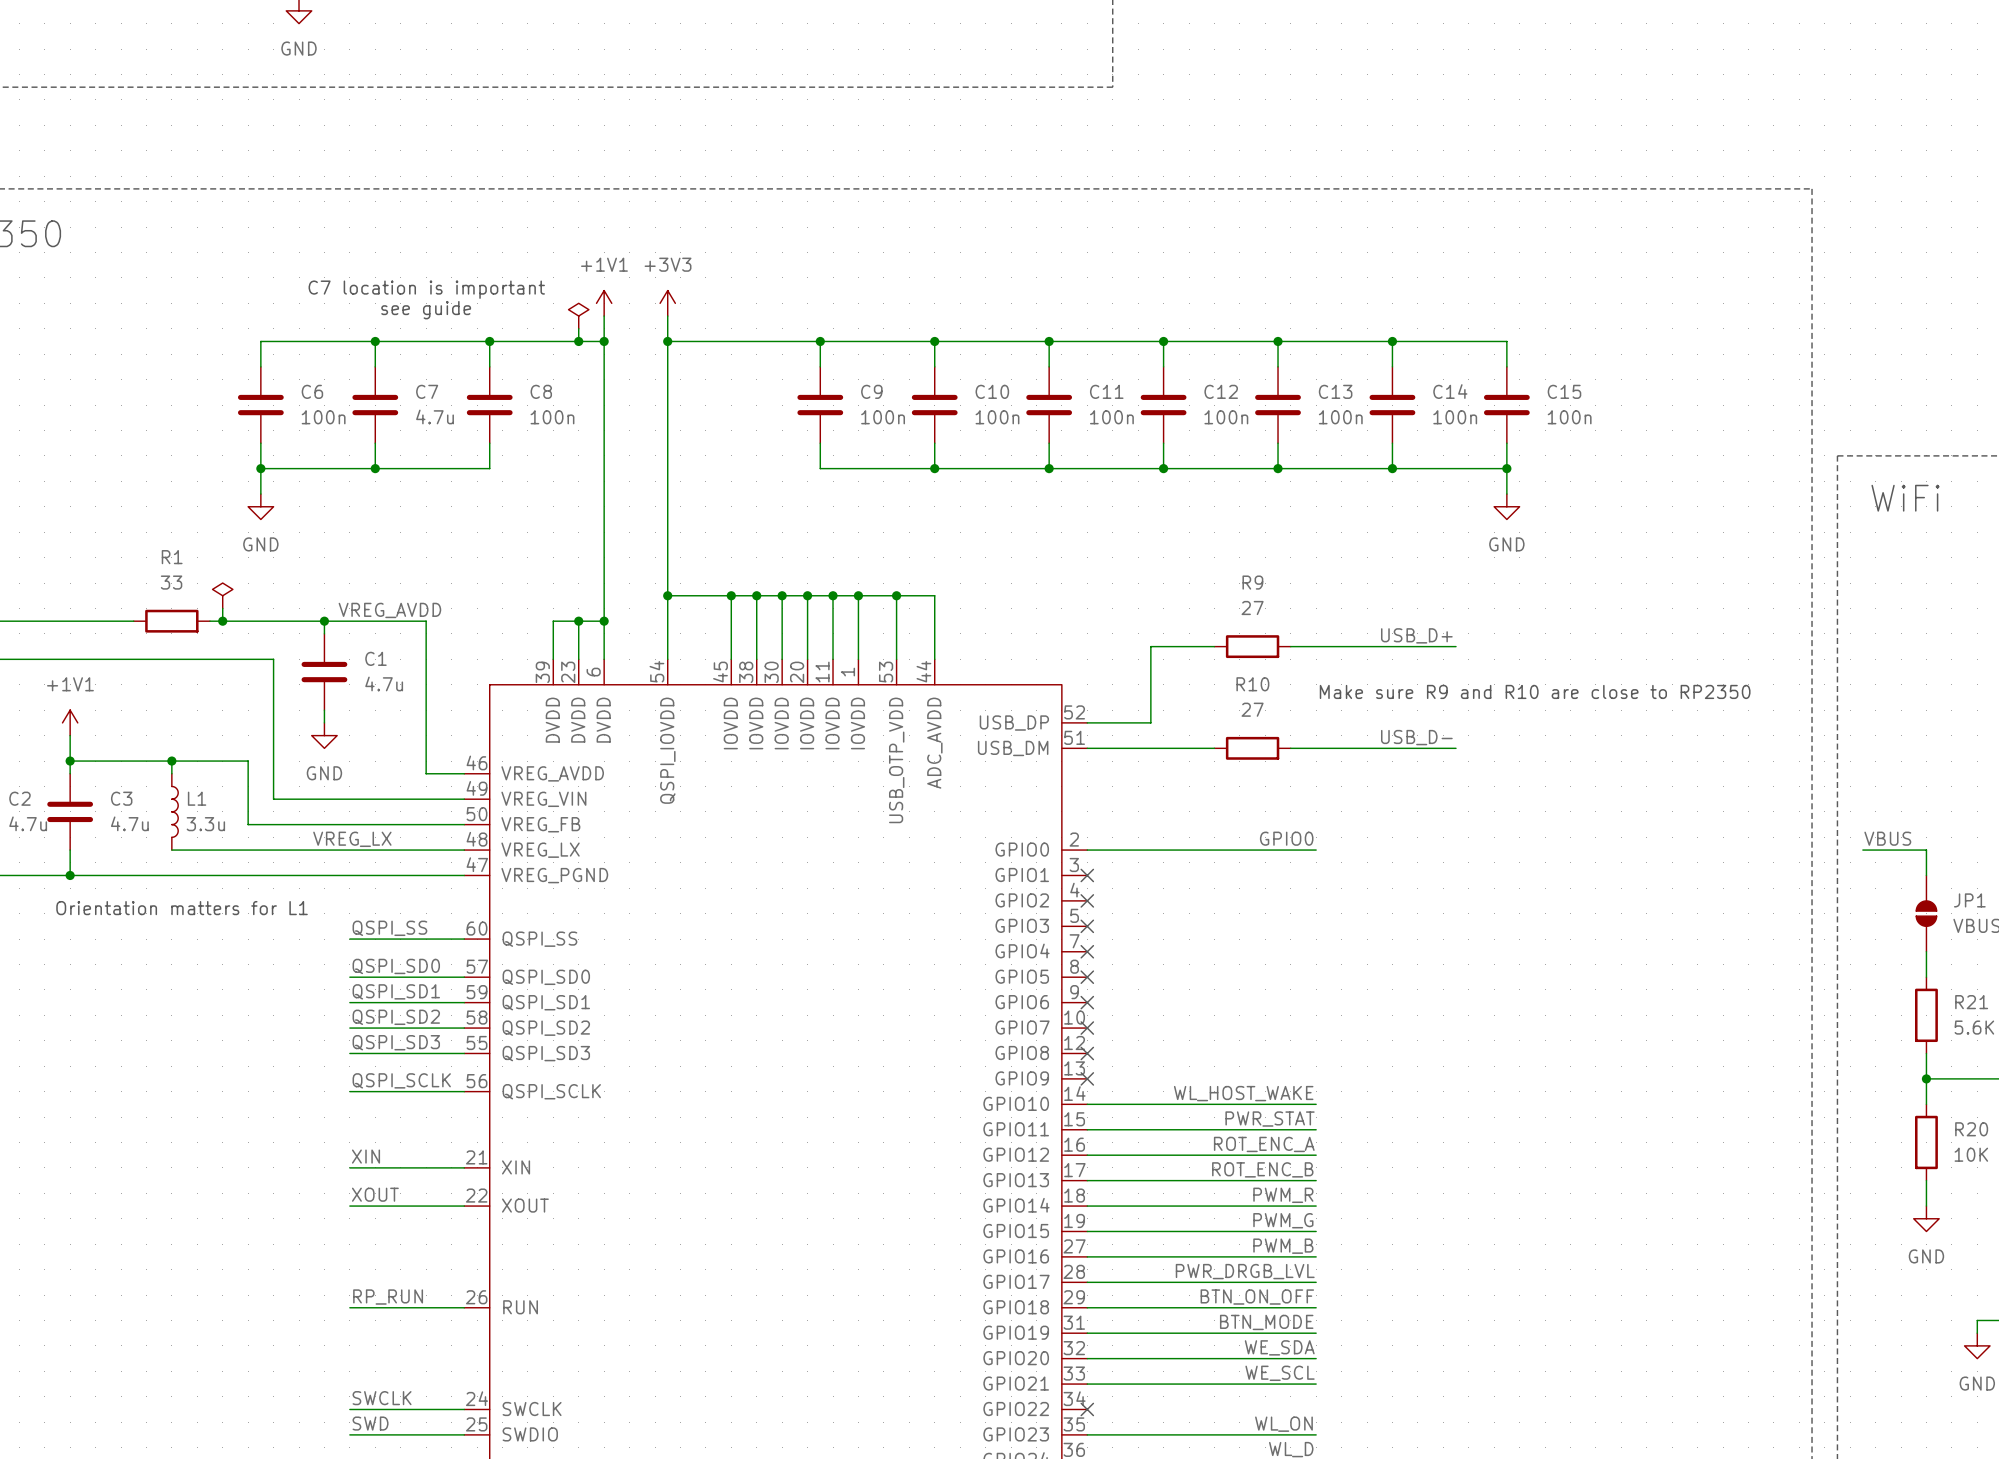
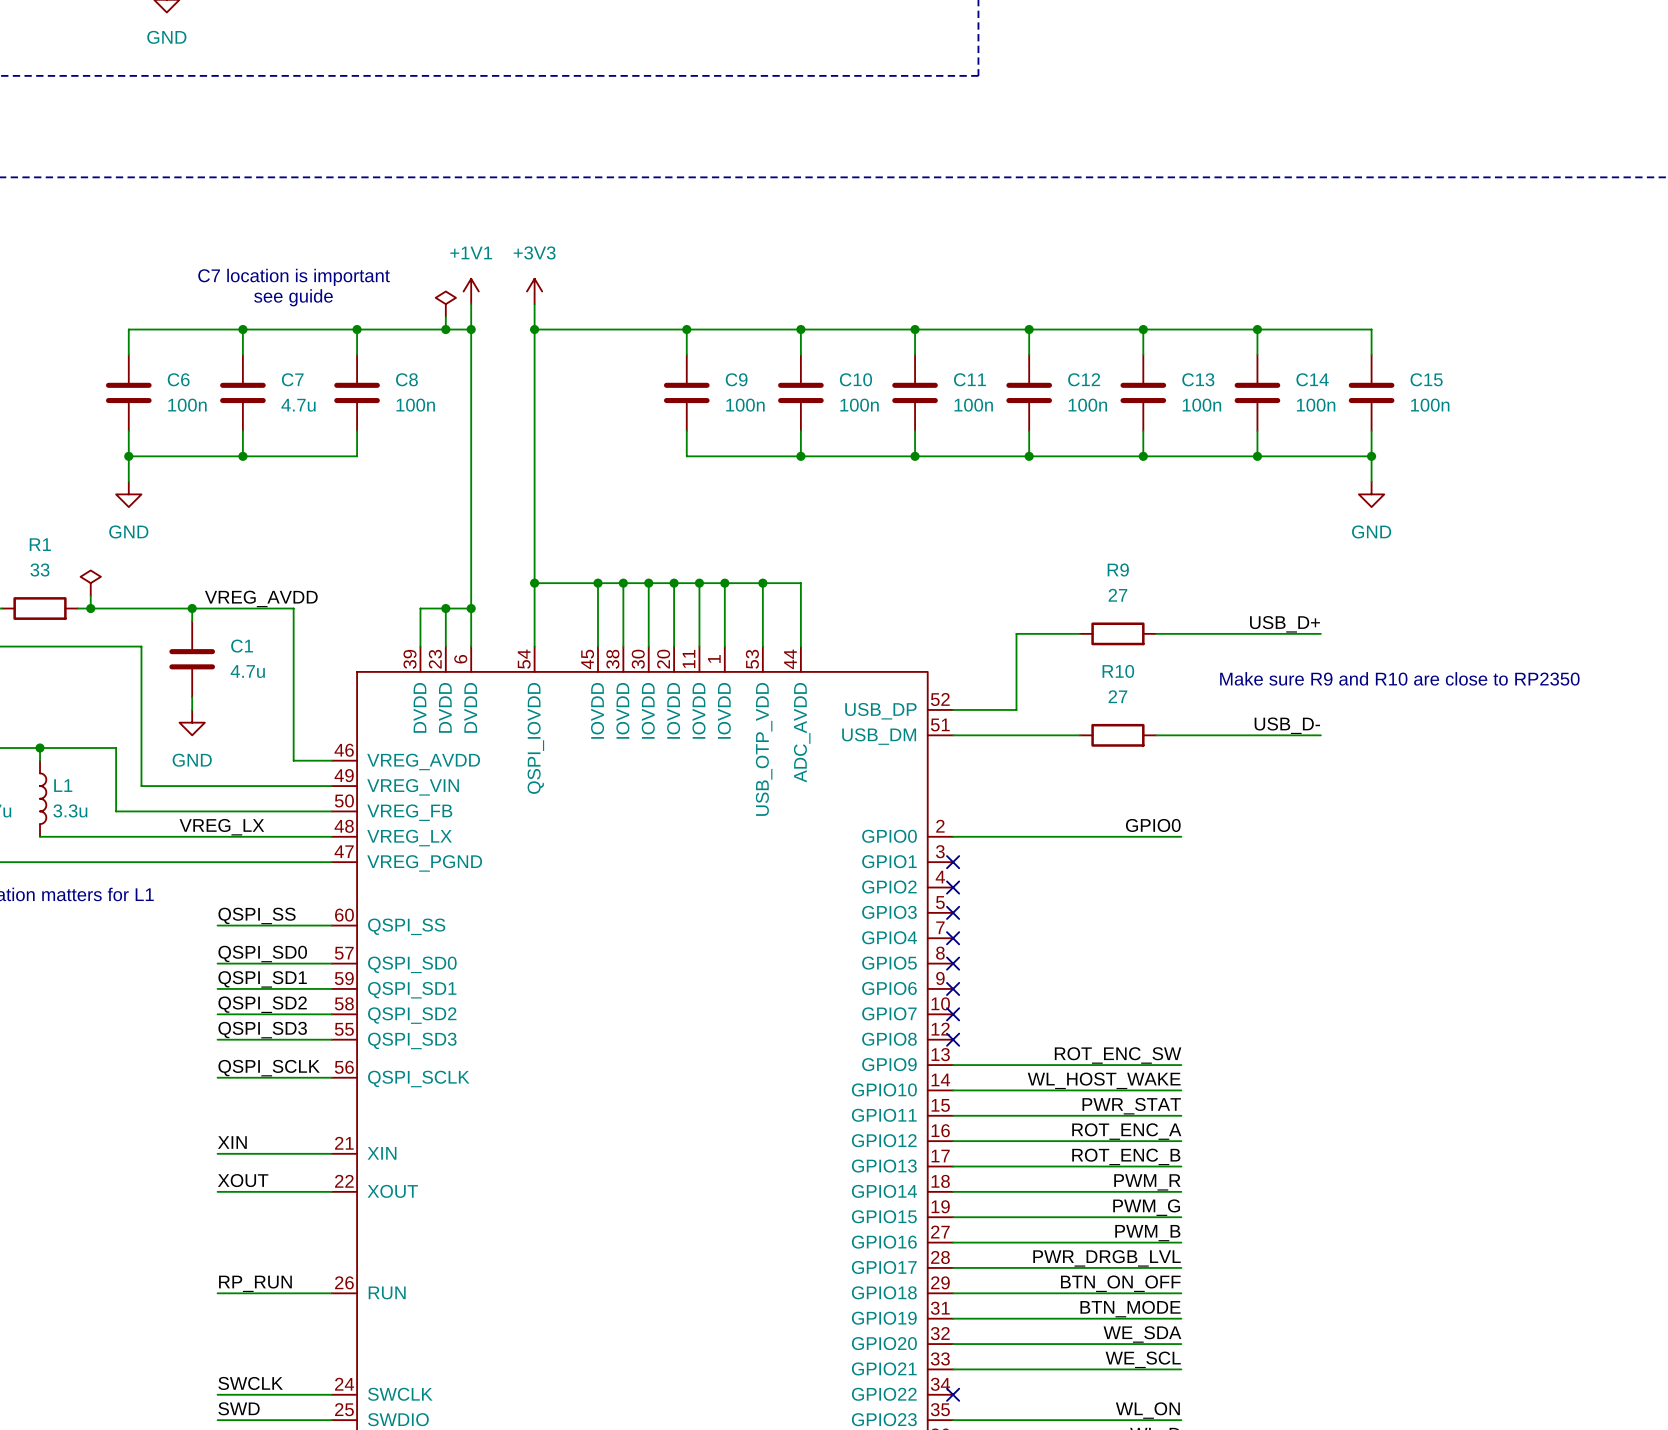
label: none -> ROT_ENC_SW (1118, 1055)
wire: none -> (953, 1065) (1181, 1065)
no-connect mark: (1087, 1078) -> none

